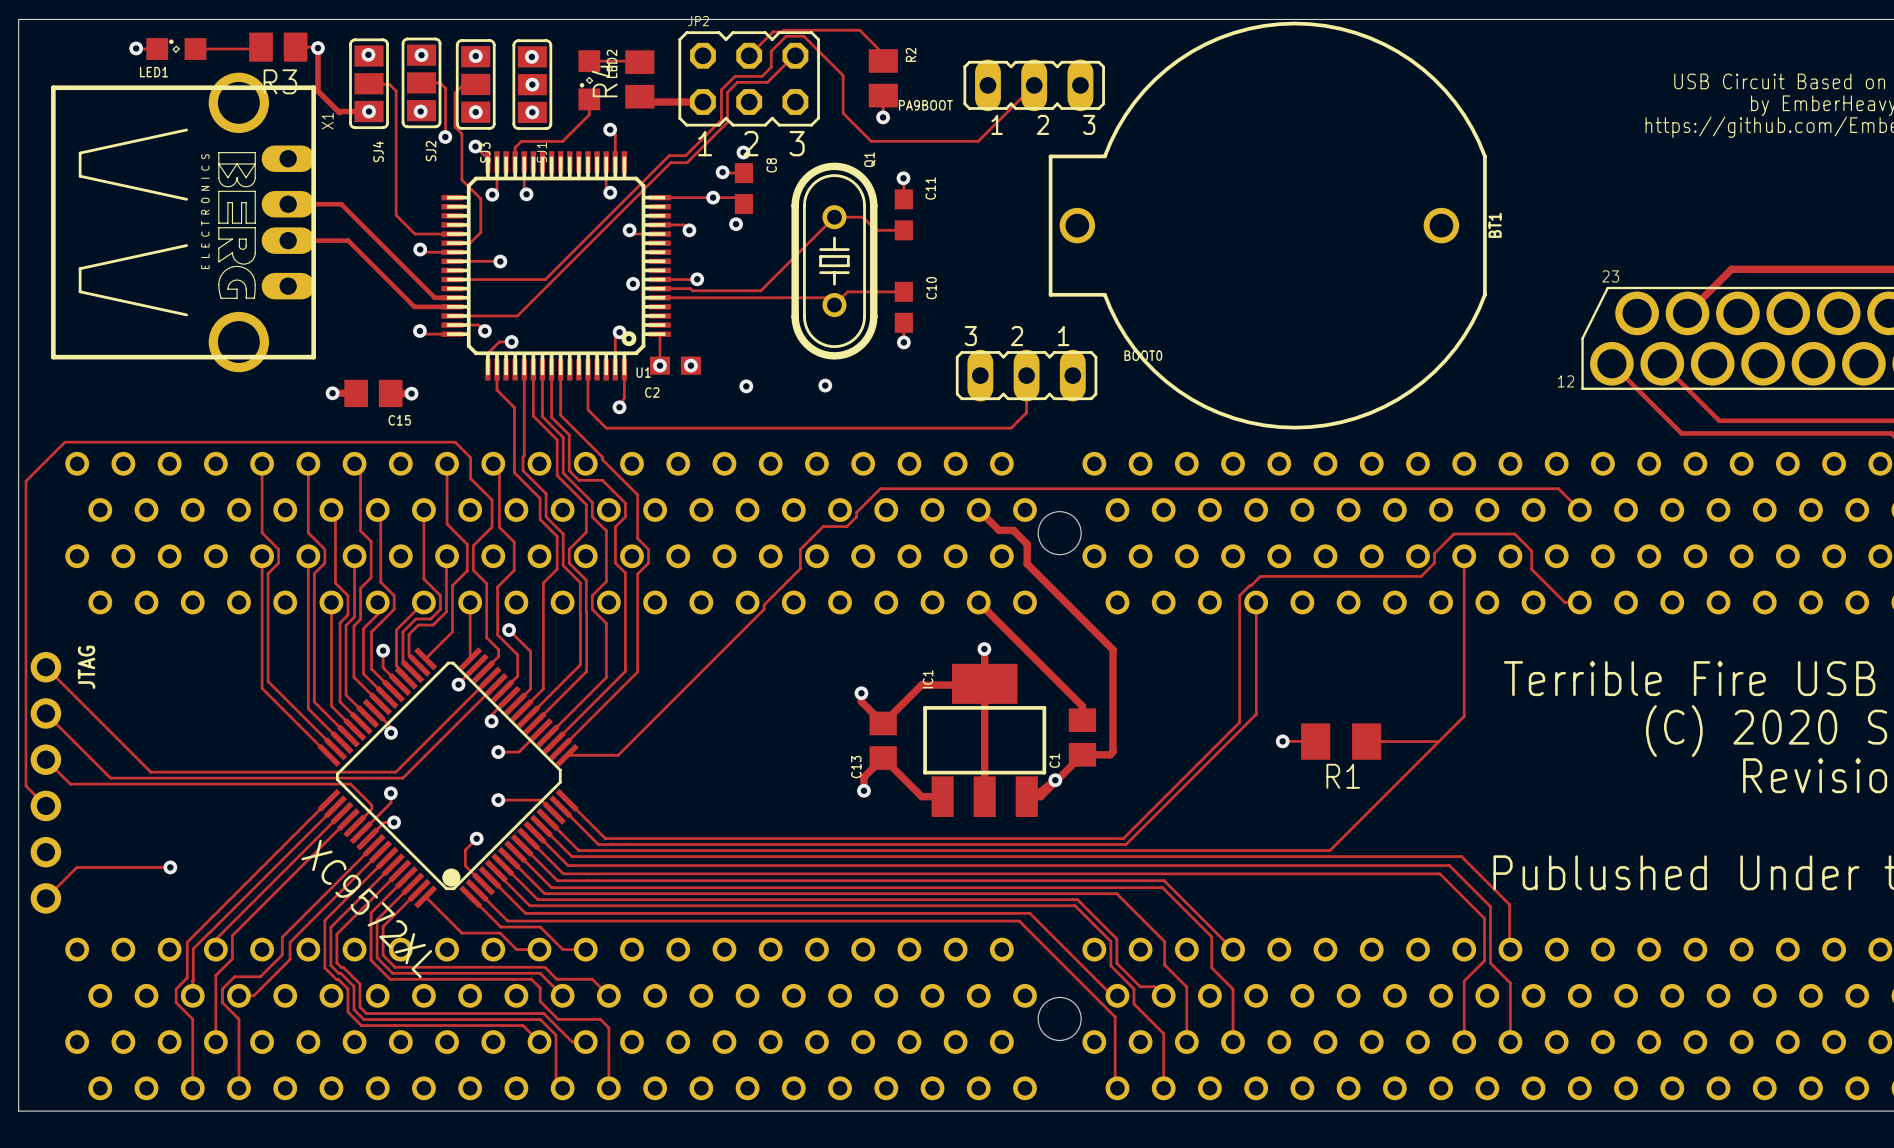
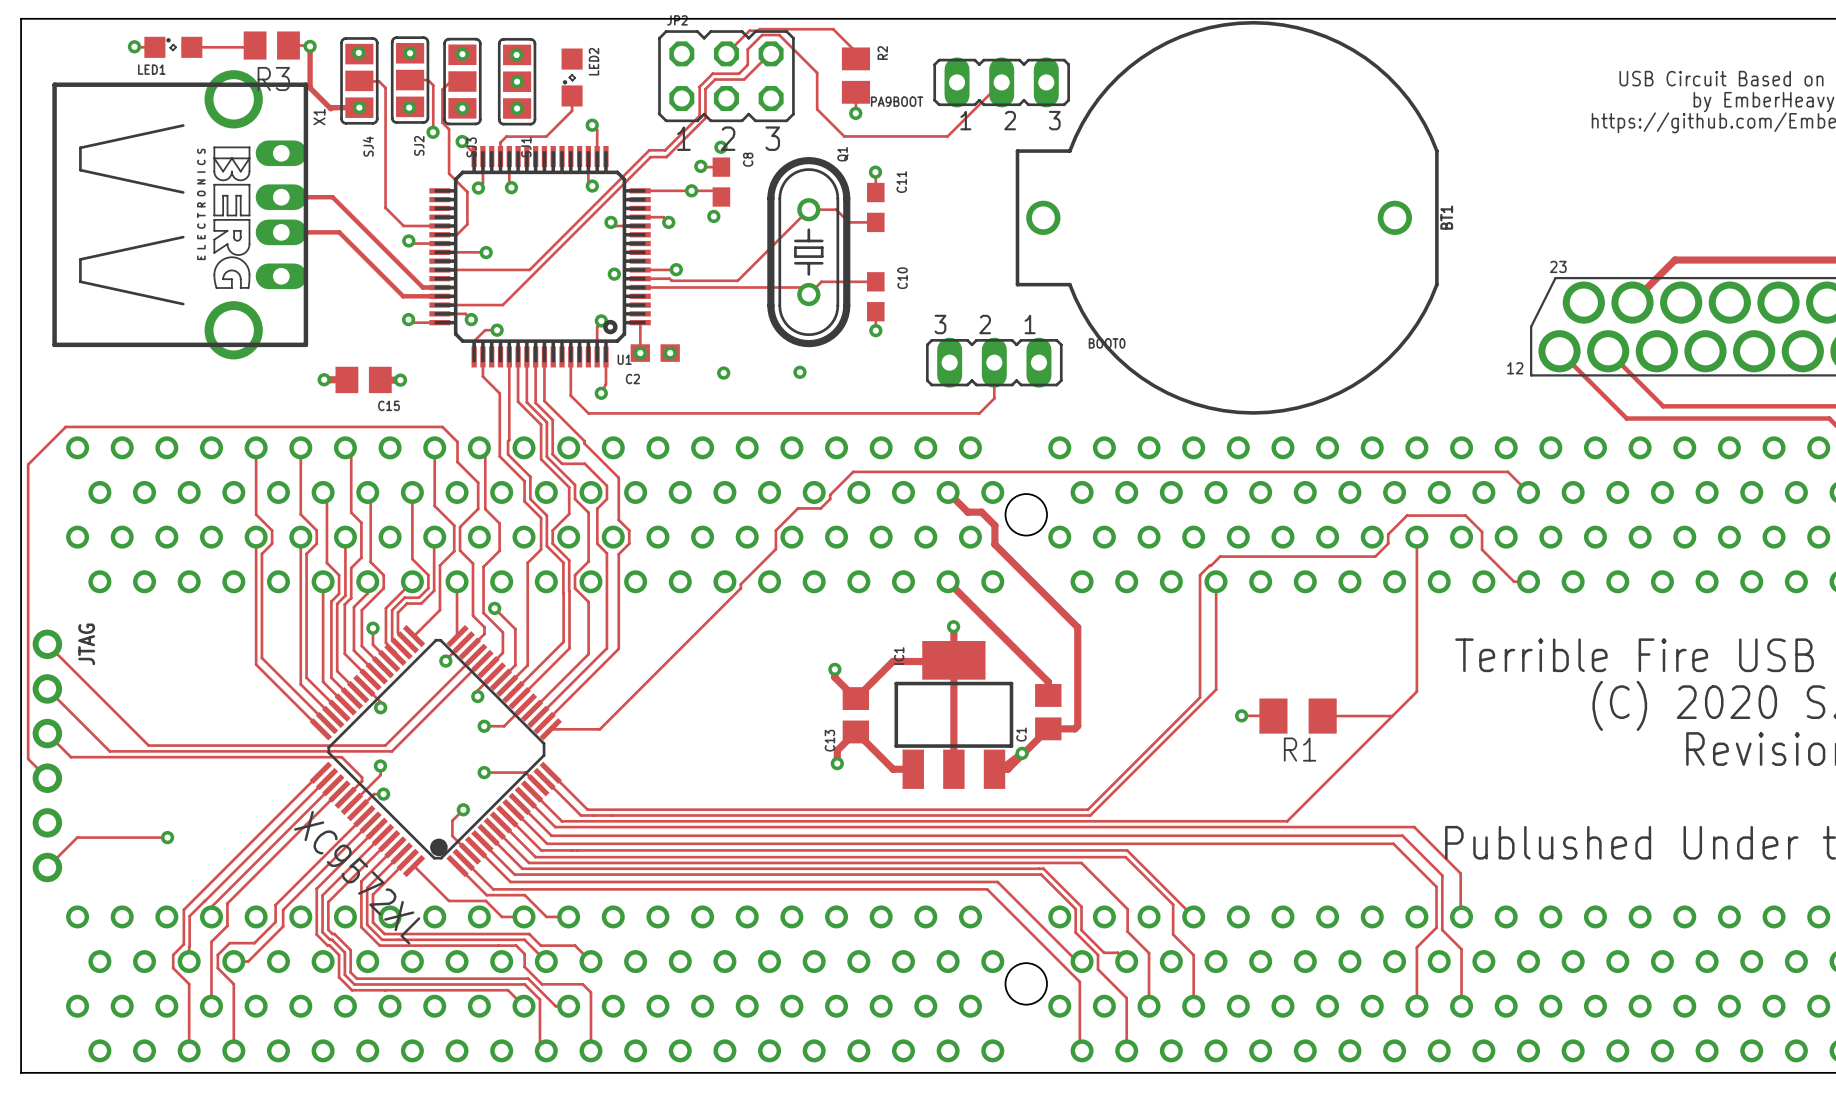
track: (589, 61) (639, 62) -> none
R4: (639, 79) -> none
track: (639, 96) (645, 102) (702, 102) -> none

